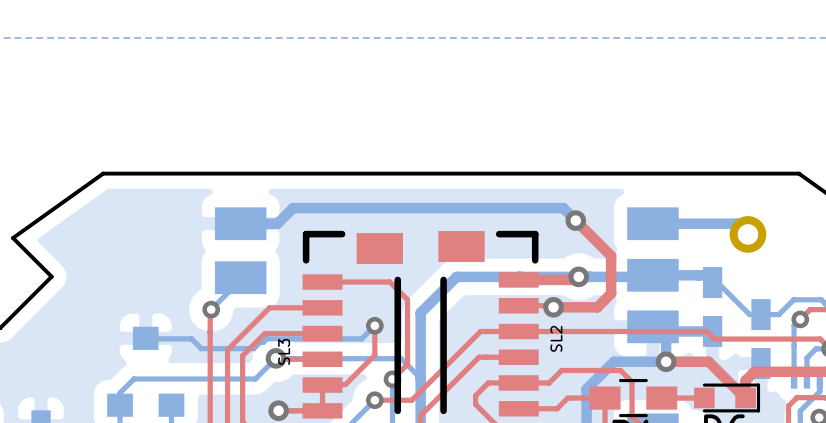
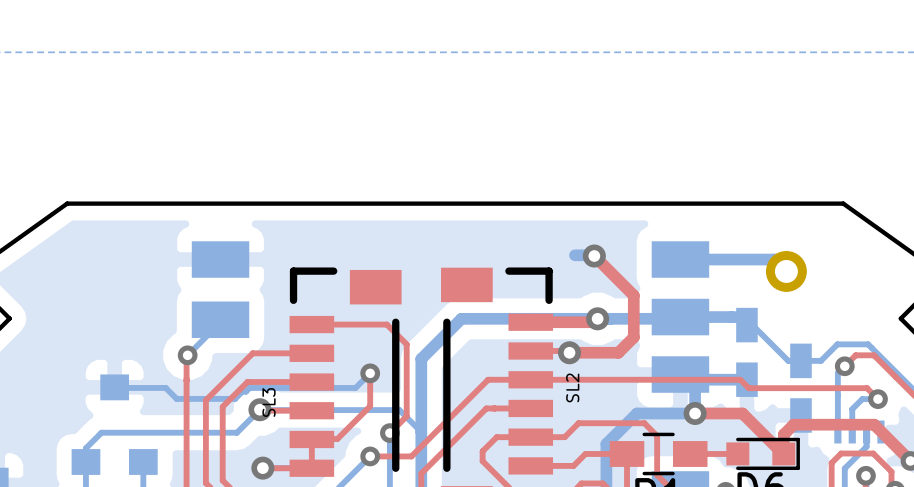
bottom track: (575, 219) (563, 208) (293, 208) (277, 223) (240, 223) -> (593, 255) (575, 255)

